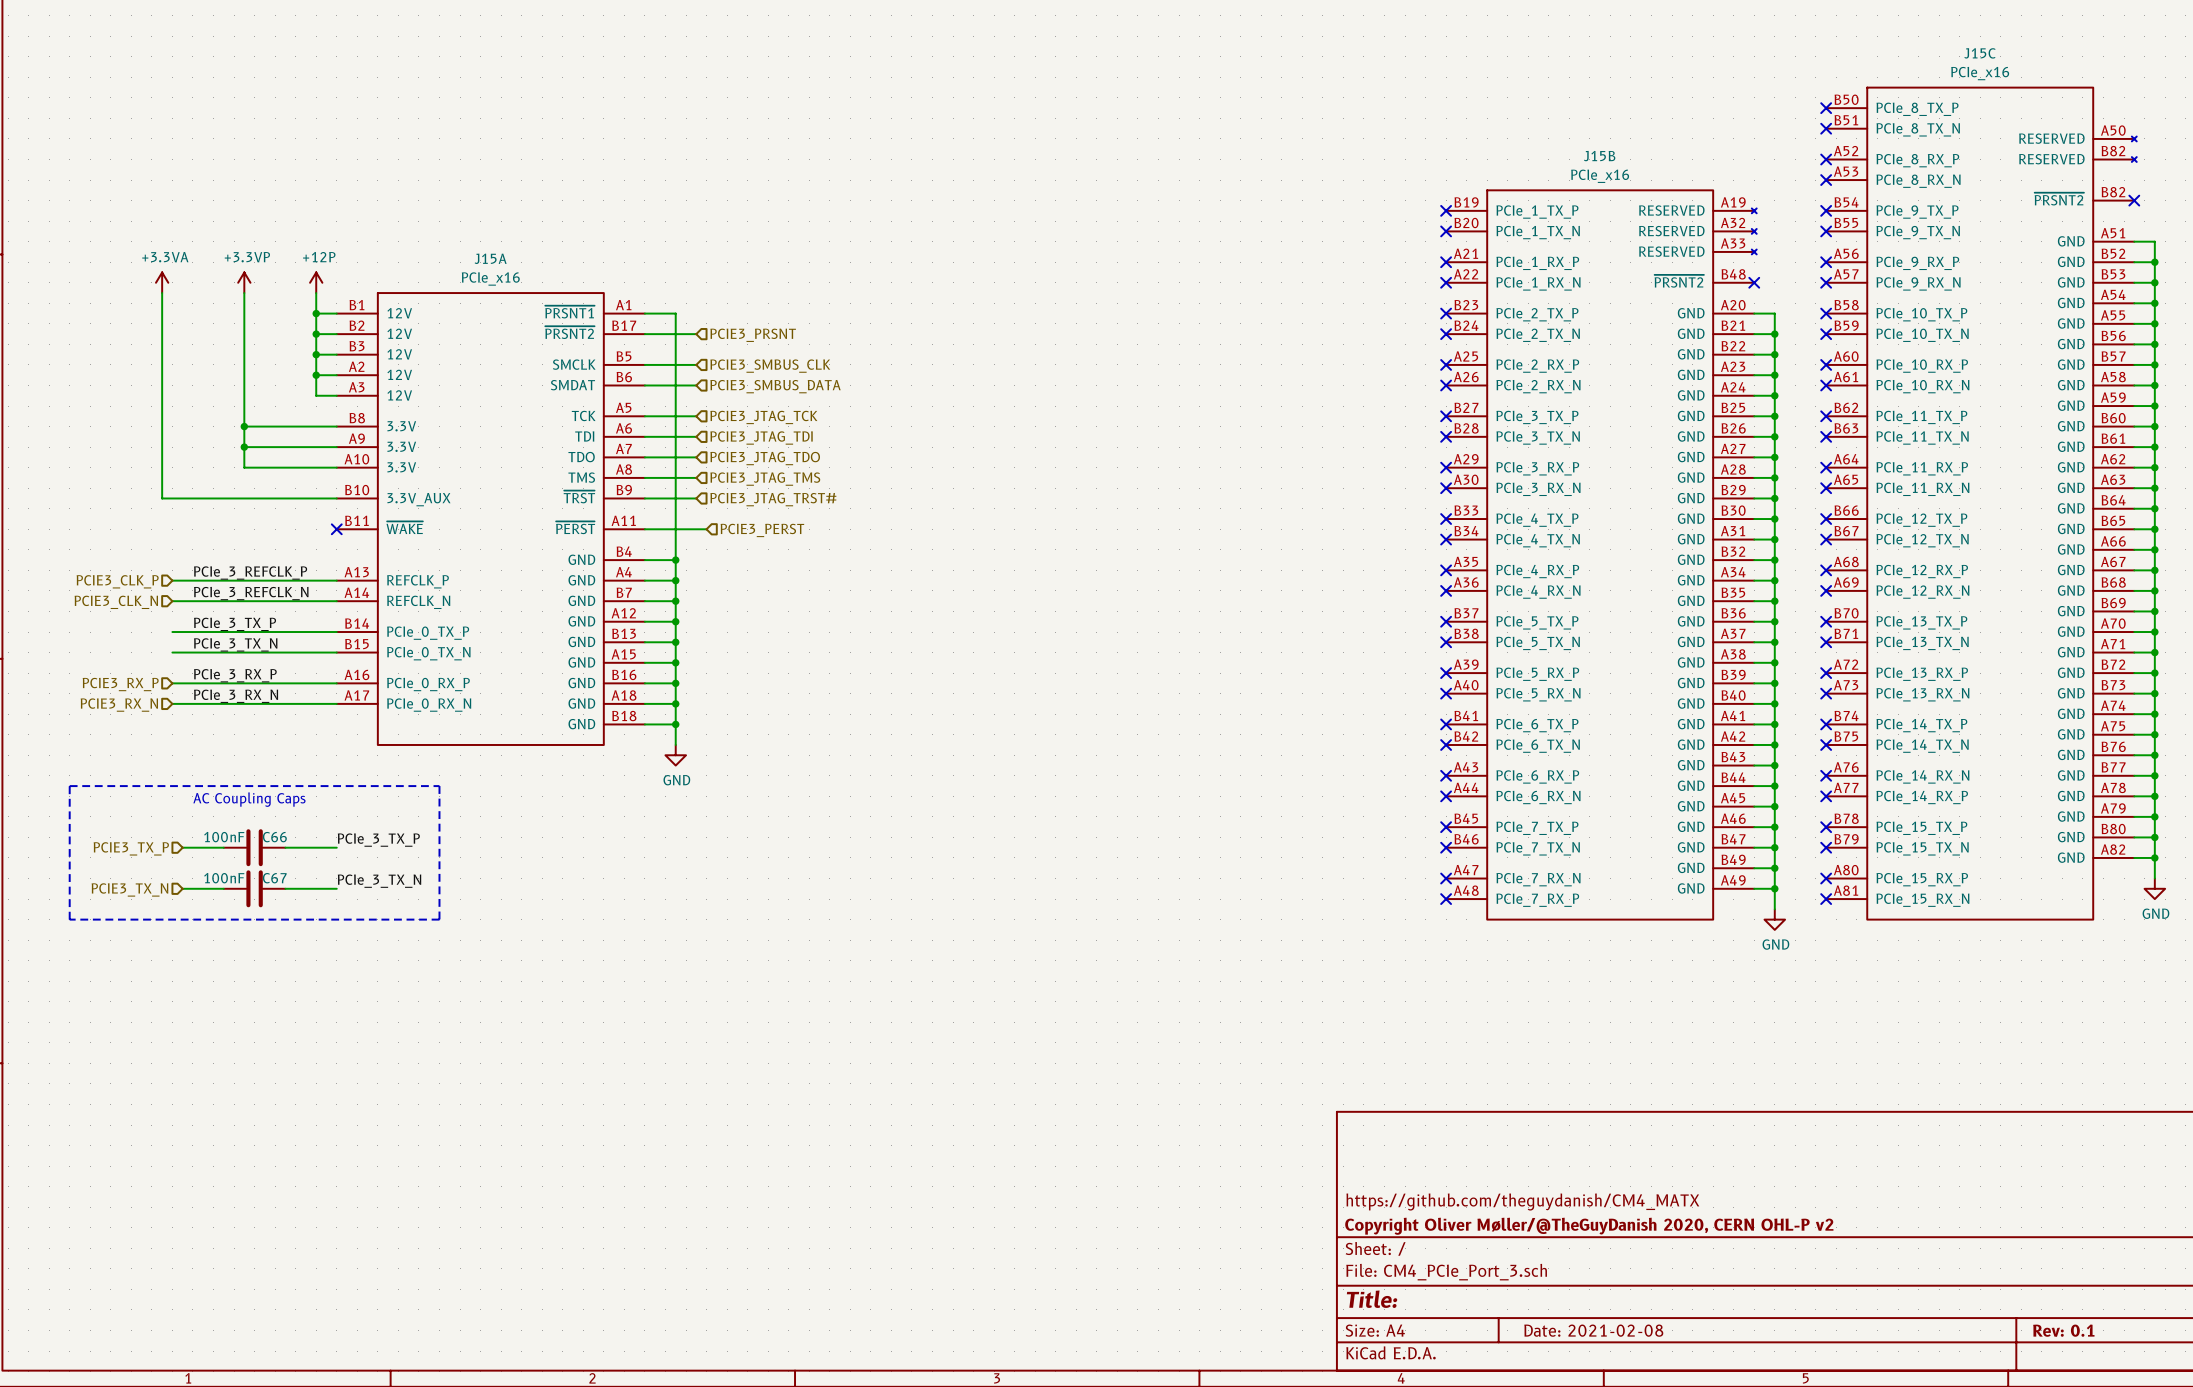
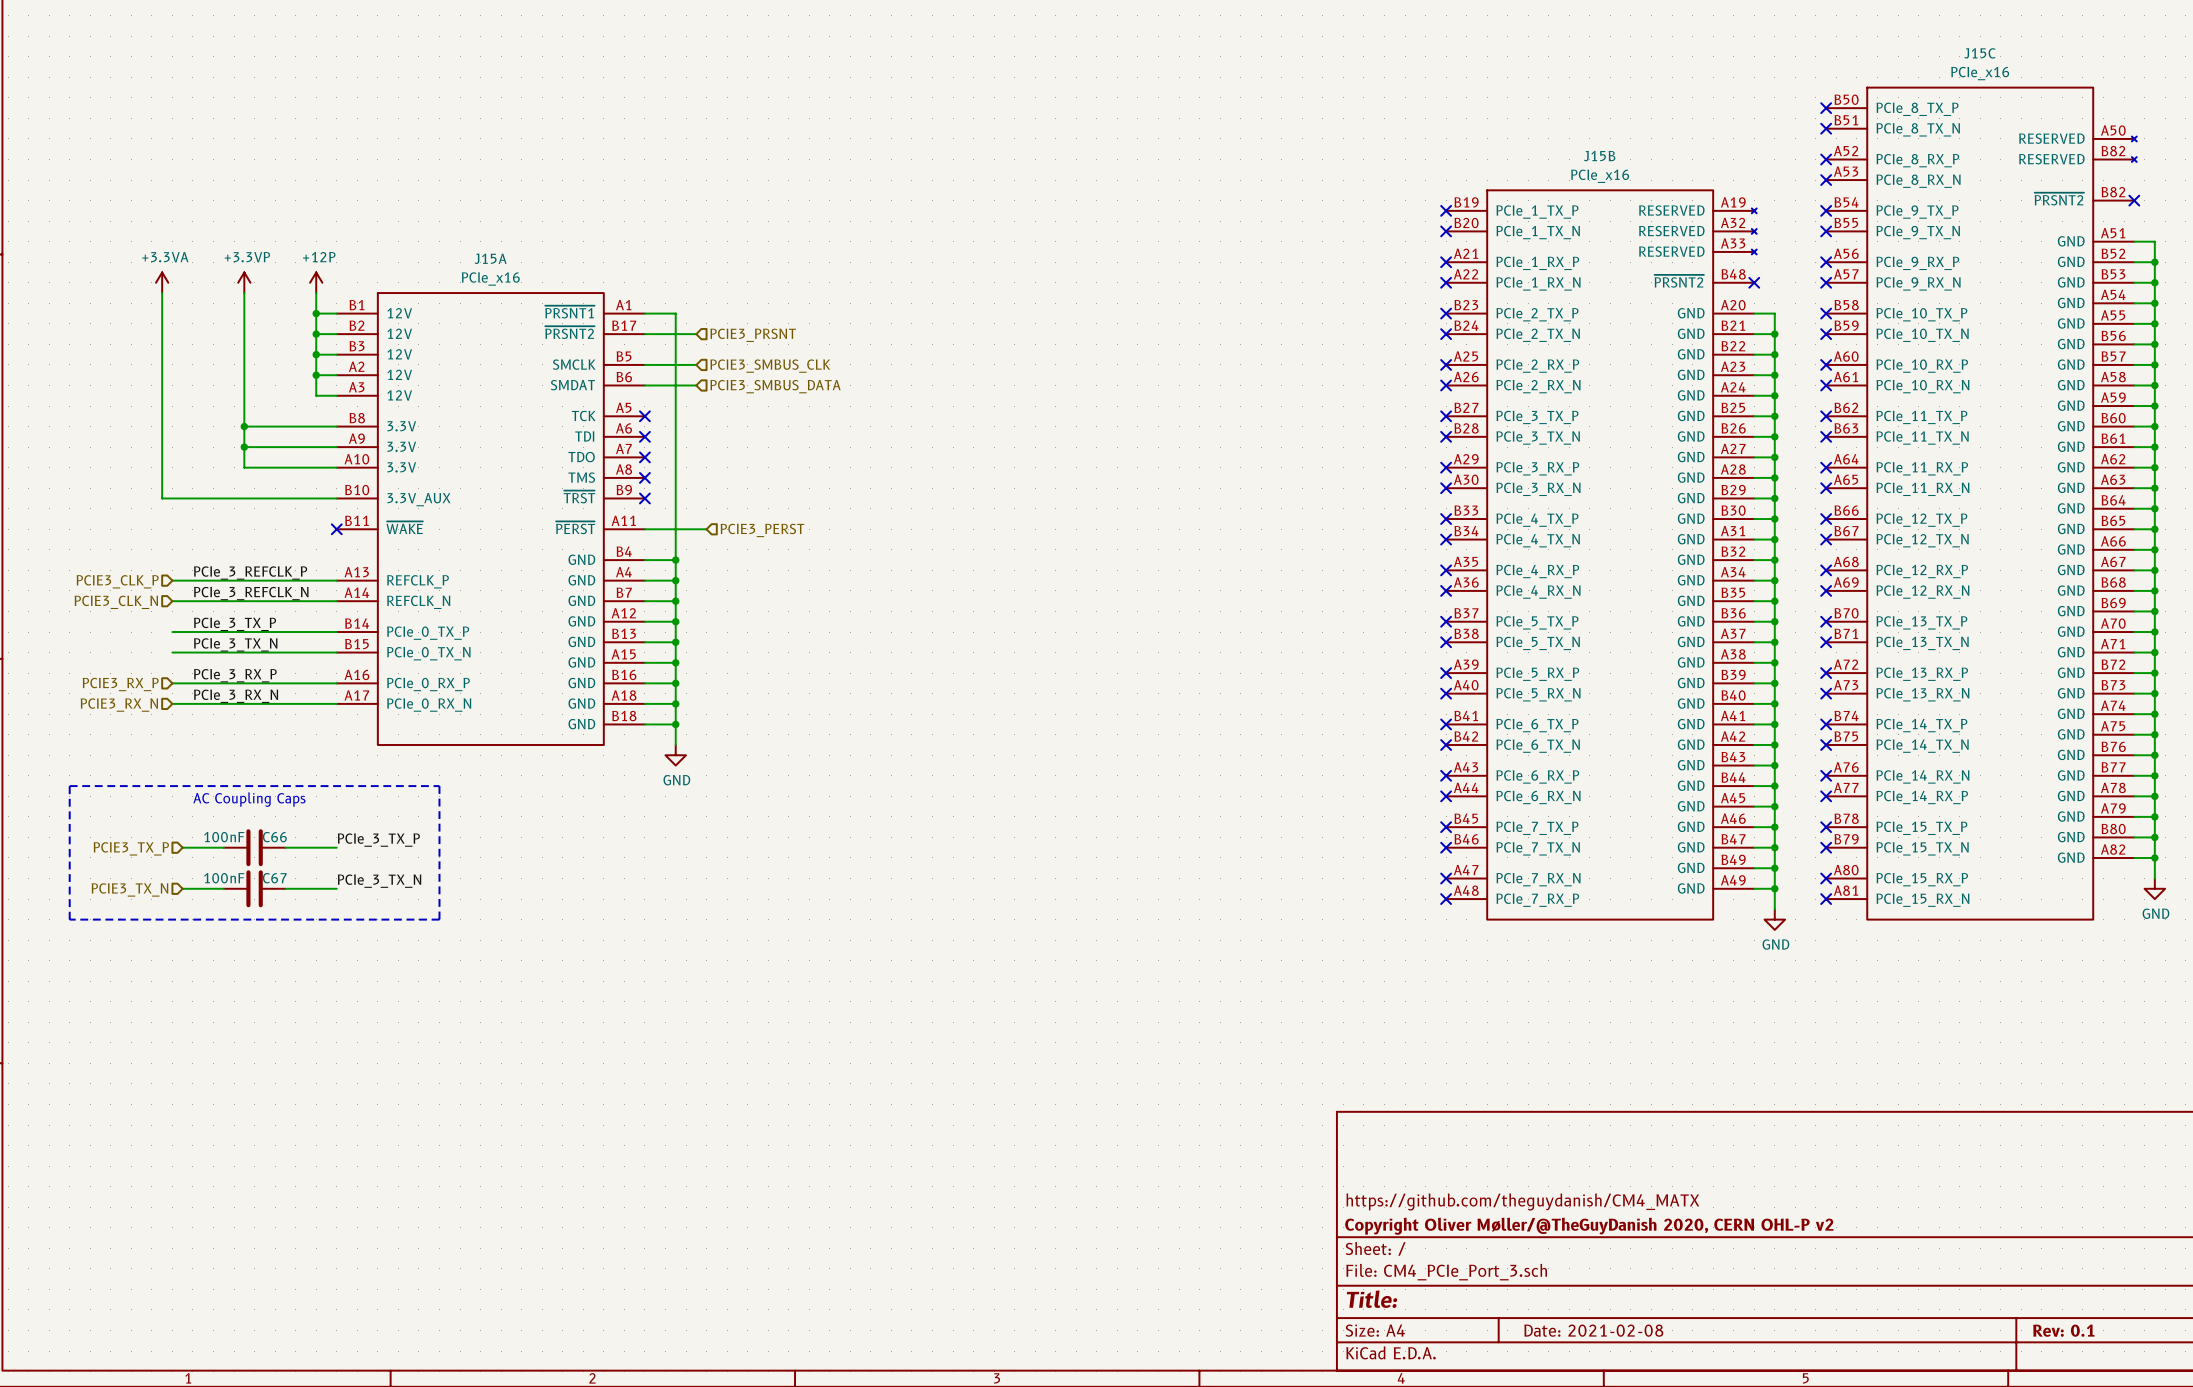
wire: (644, 416) (696, 416) -> none
no-connect mark: none -> (644, 416)
hierarchical label: PCIE3_JTAG_TCK (763, 417) -> none
wire: (644, 436) (696, 436) -> none
no-connect mark: none -> (644, 436)
hierarchical label: PCIE3_JTAG_TDI (761, 437) -> none
wire: (644, 457) (696, 457) -> none
no-connect mark: none -> (644, 457)
hierarchical label: PCIE3_JTAG_TDO (765, 458) -> none
wire: (644, 477) (696, 477) -> none
no-connect mark: none -> (644, 477)
hierarchical label: PCIE3_JTAG_TMS (765, 479) -> none
wire: (644, 498) (696, 498) -> none
no-connect mark: none -> (644, 498)
hierarchical label: PCIE3_JTAG_TRST# (773, 499) -> none

